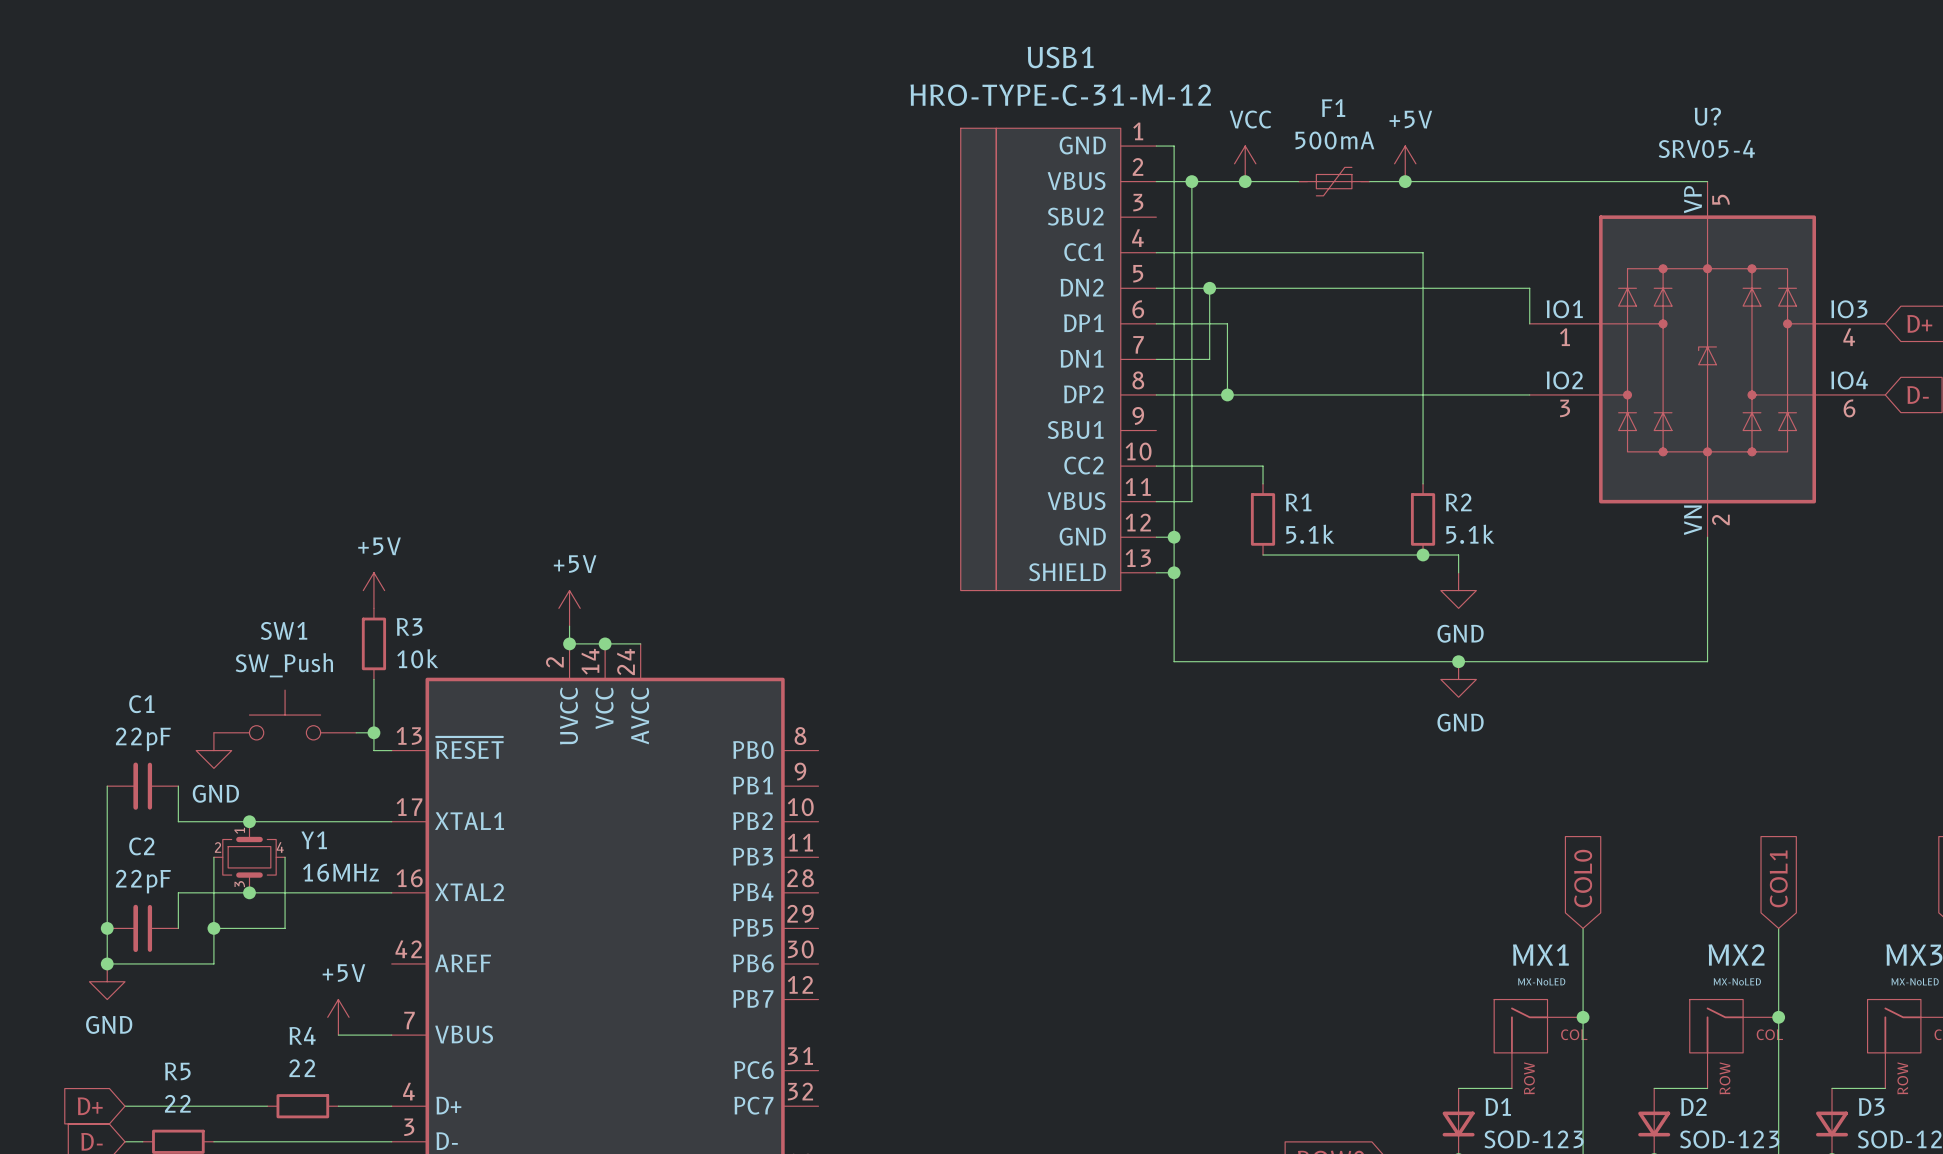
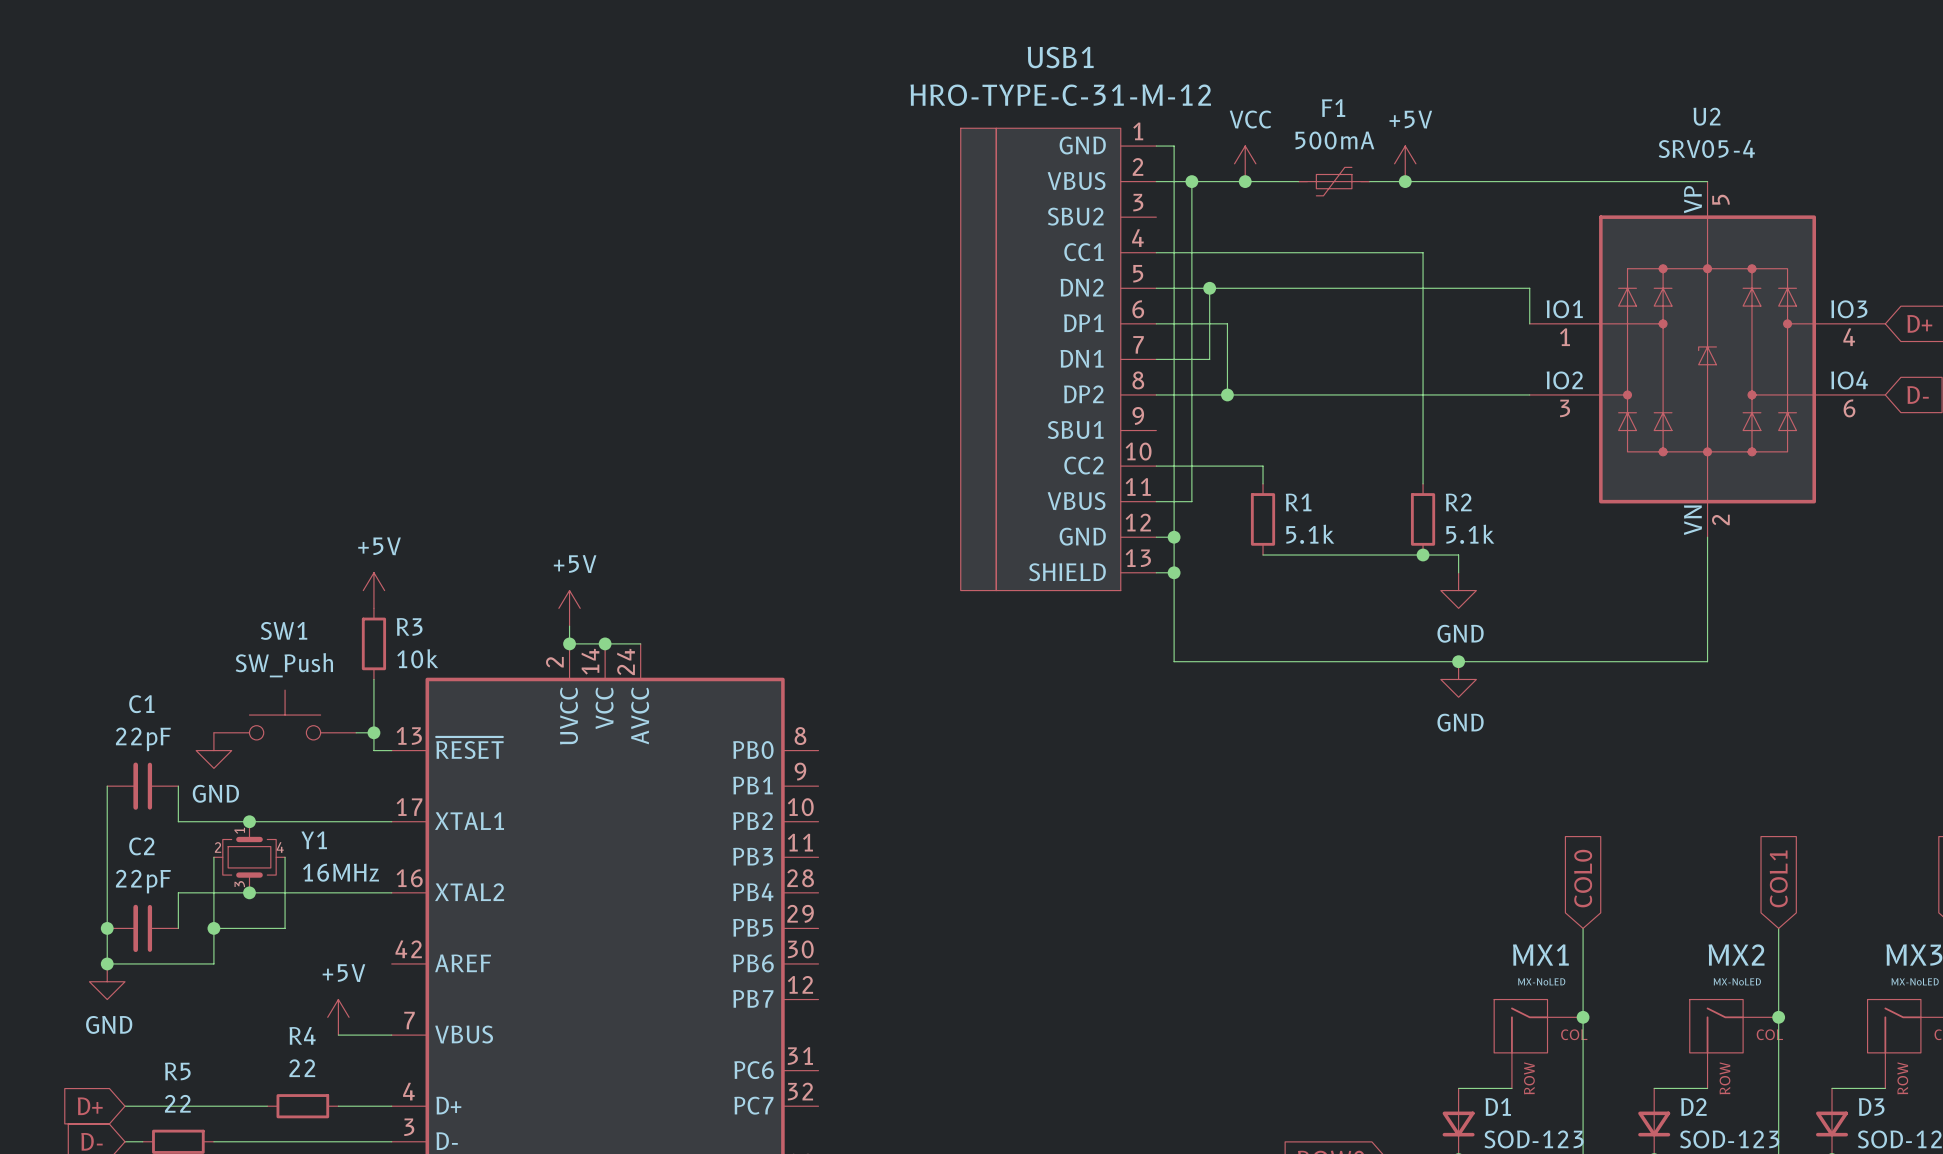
U? name: U? (1707, 116) -> U2 (1706, 116)

